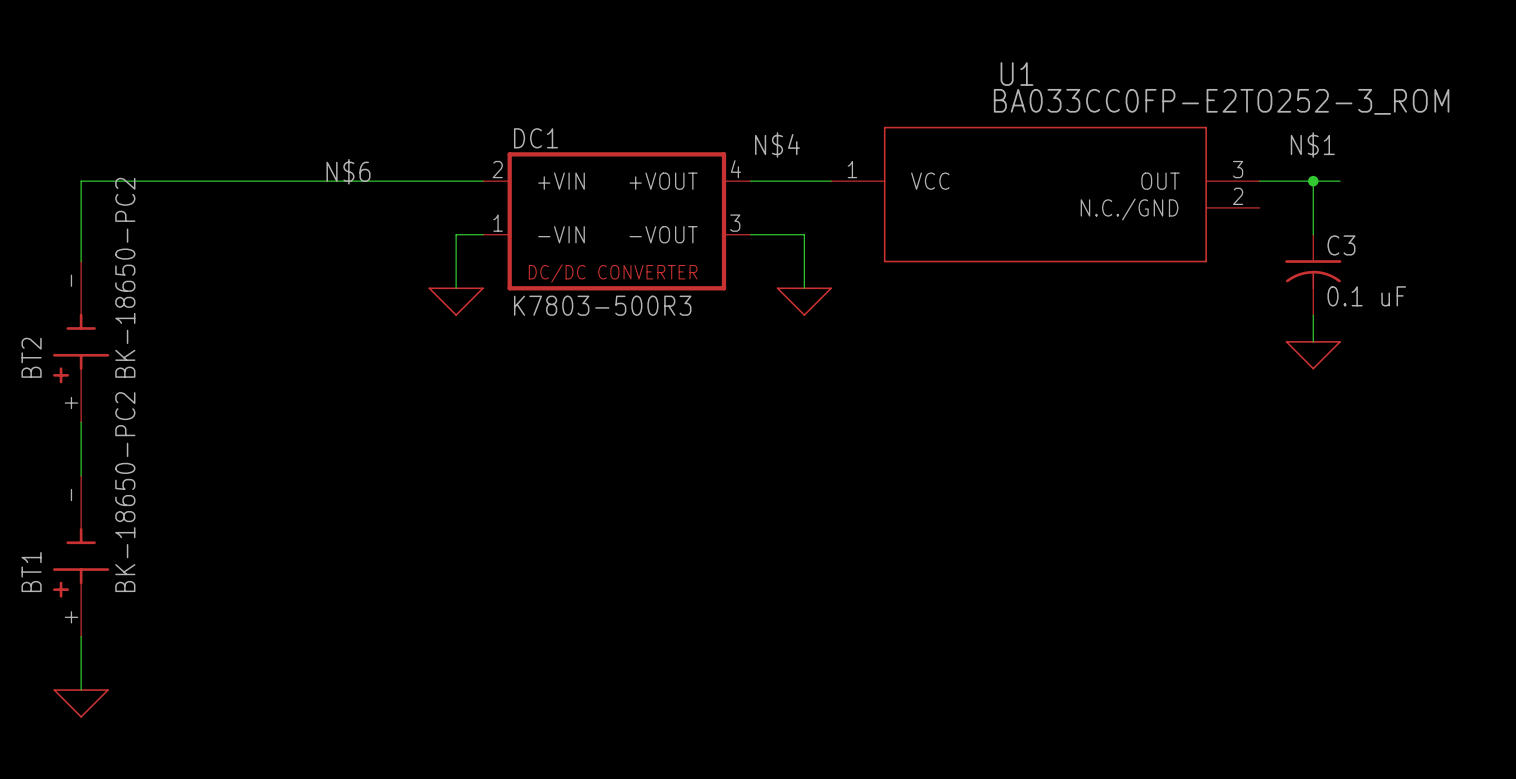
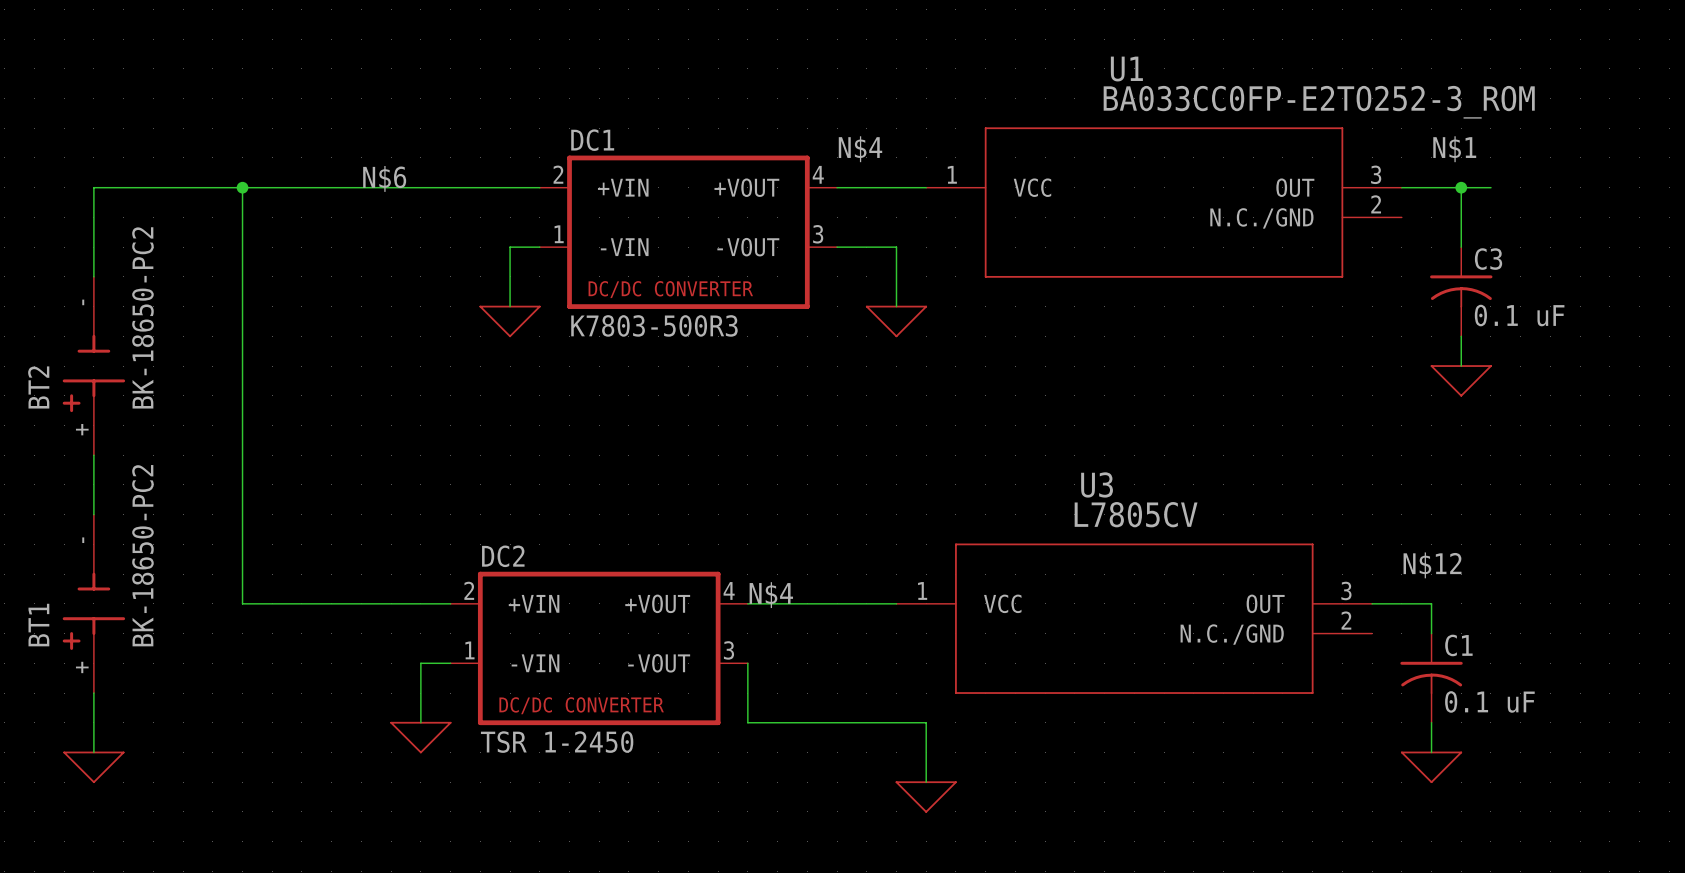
wire: none -> (242, 187) (242, 603) (450, 603)
junction: none -> (242, 187)
label: none -> N$12 (1432, 565)
label: none -> N$4 (771, 595)
wire: none -> (747, 603) (896, 603)
wire: none -> (1372, 603) (1431, 603) (1431, 633)
U3: none -> L7805CV (1134, 618)
DC2: none -> TSR 1-2450 (599, 648)
wire: none -> (450, 663) (420, 663) (420, 722)
wire: none -> (747, 663) (747, 722) (926, 722) (926, 782)
C1: none -> 0.1 uF (1431, 678)
wire: none -> (1431, 722) (1431, 752)
power symbol: none -> (420, 737)
power symbol: none -> (1431, 767)
power symbol: none -> (926, 797)

